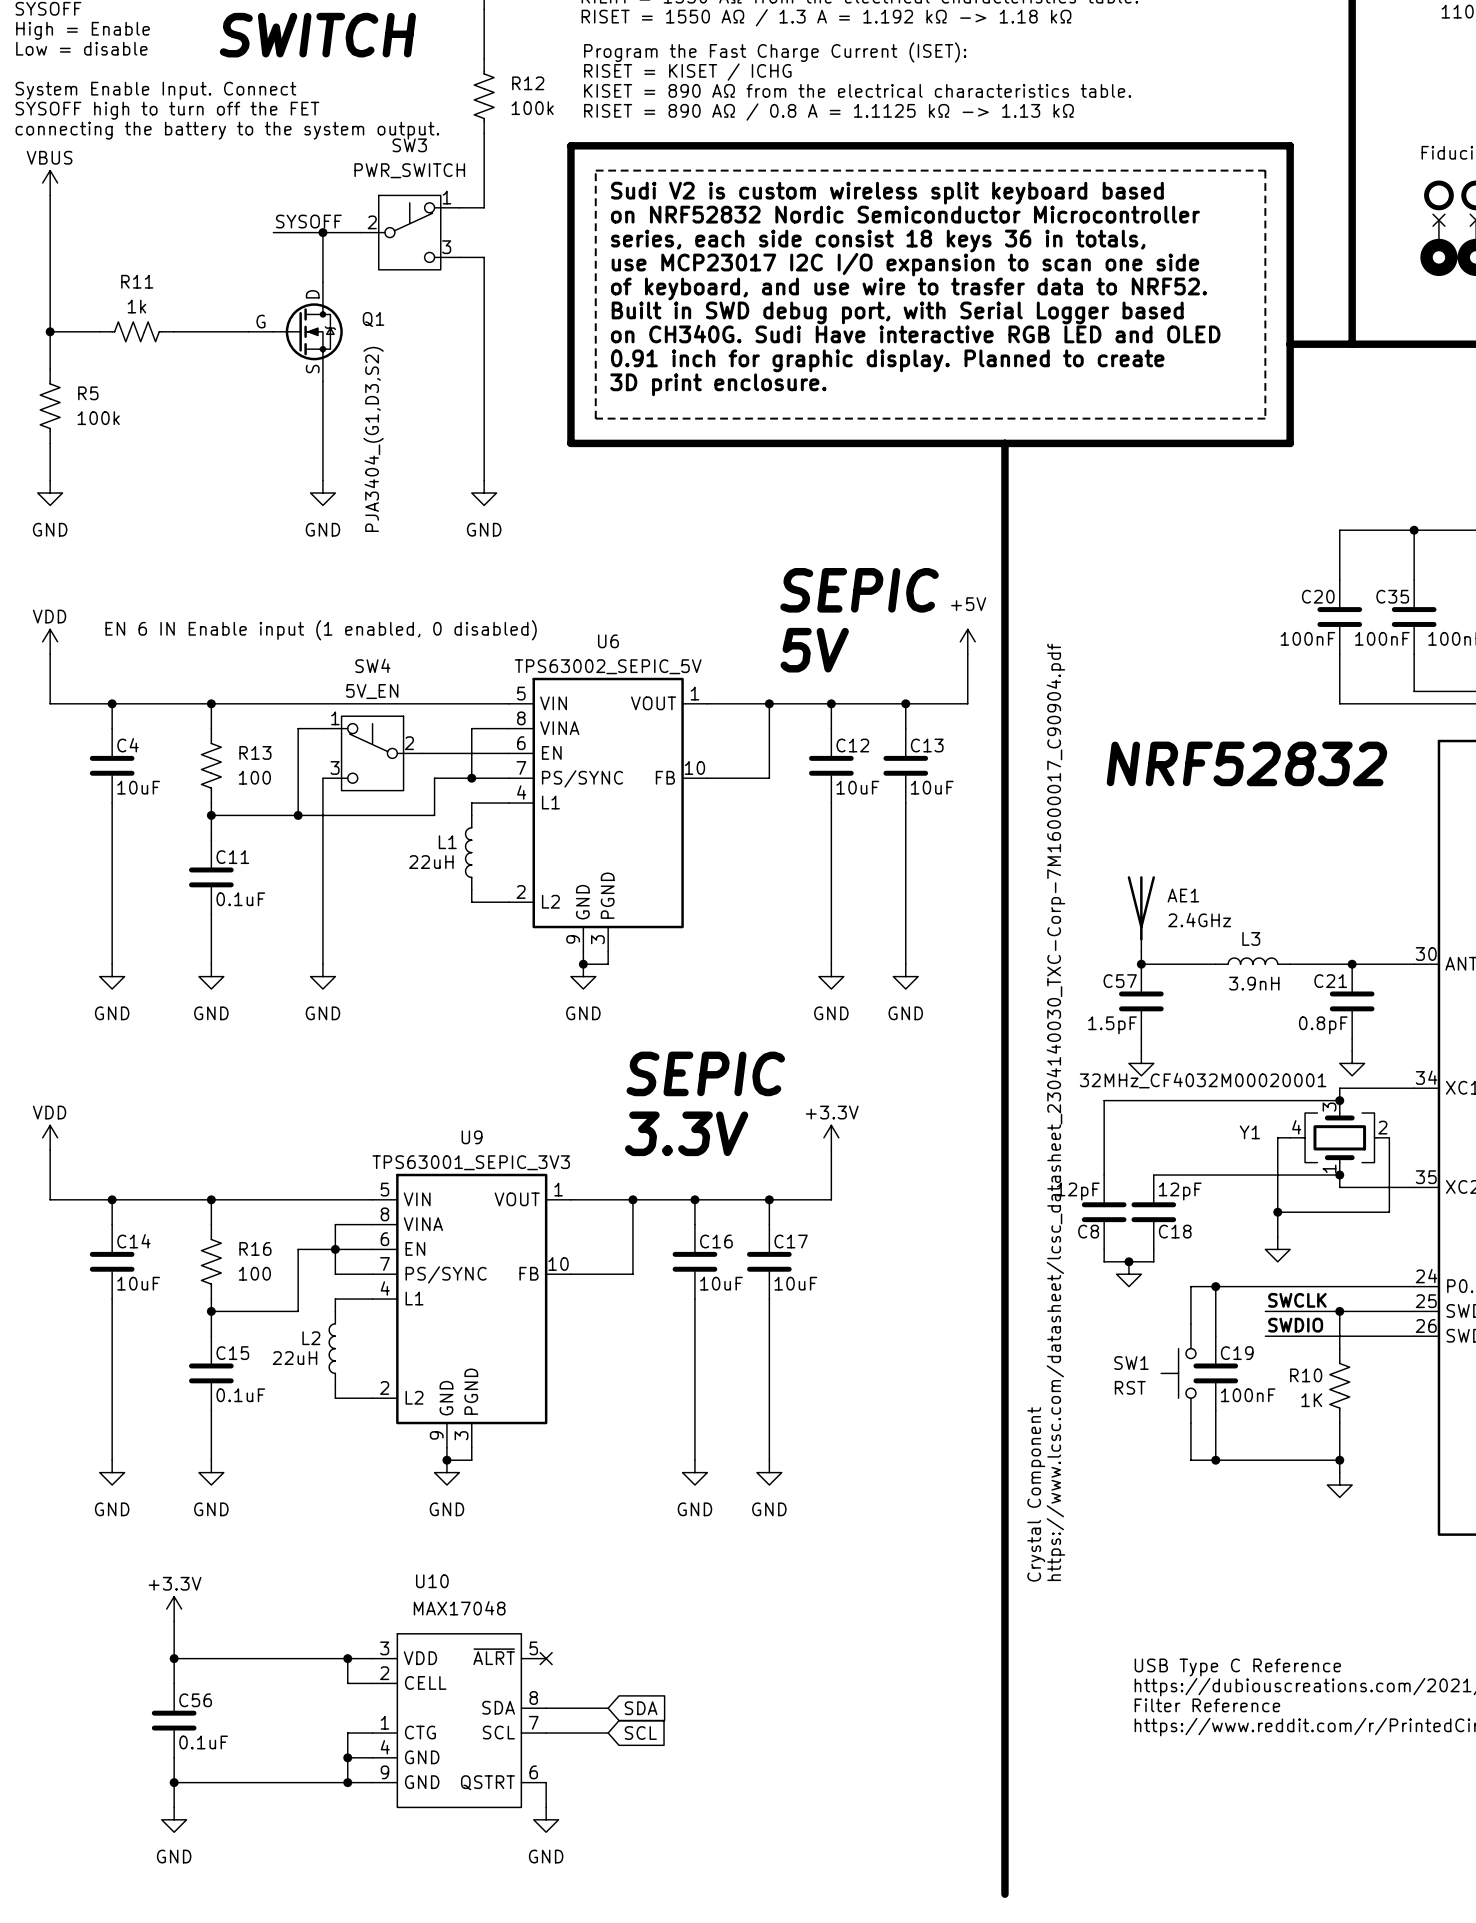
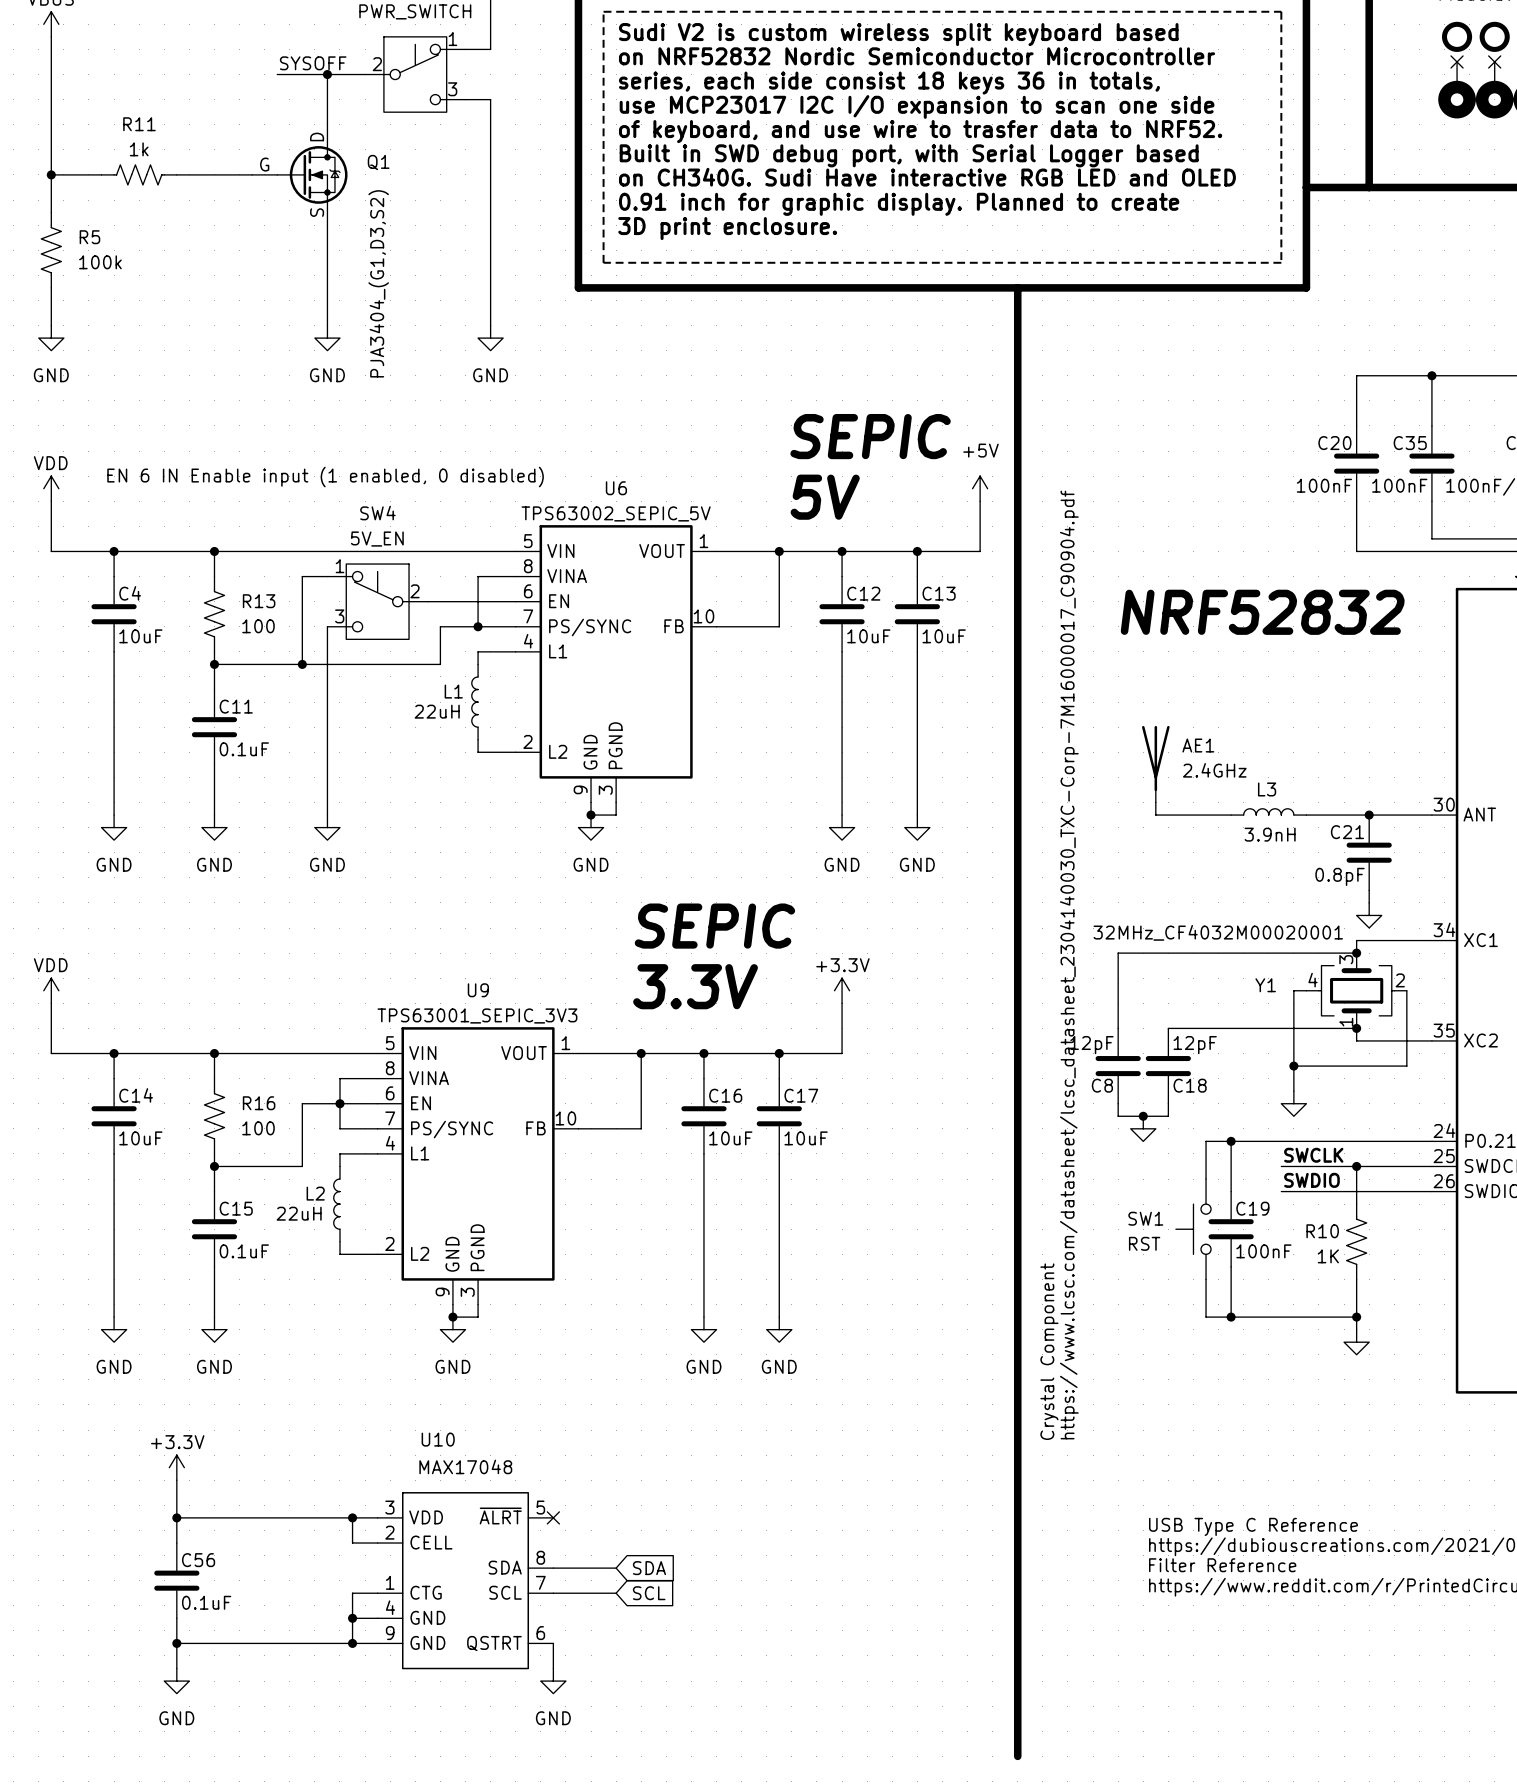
junction: (1141, 964) -> none
C57: 1.5pF (1141, 1001) -> none
wire: (1141, 1038) (1141, 1051) -> none
power symbol: (1141, 1063) -> none

